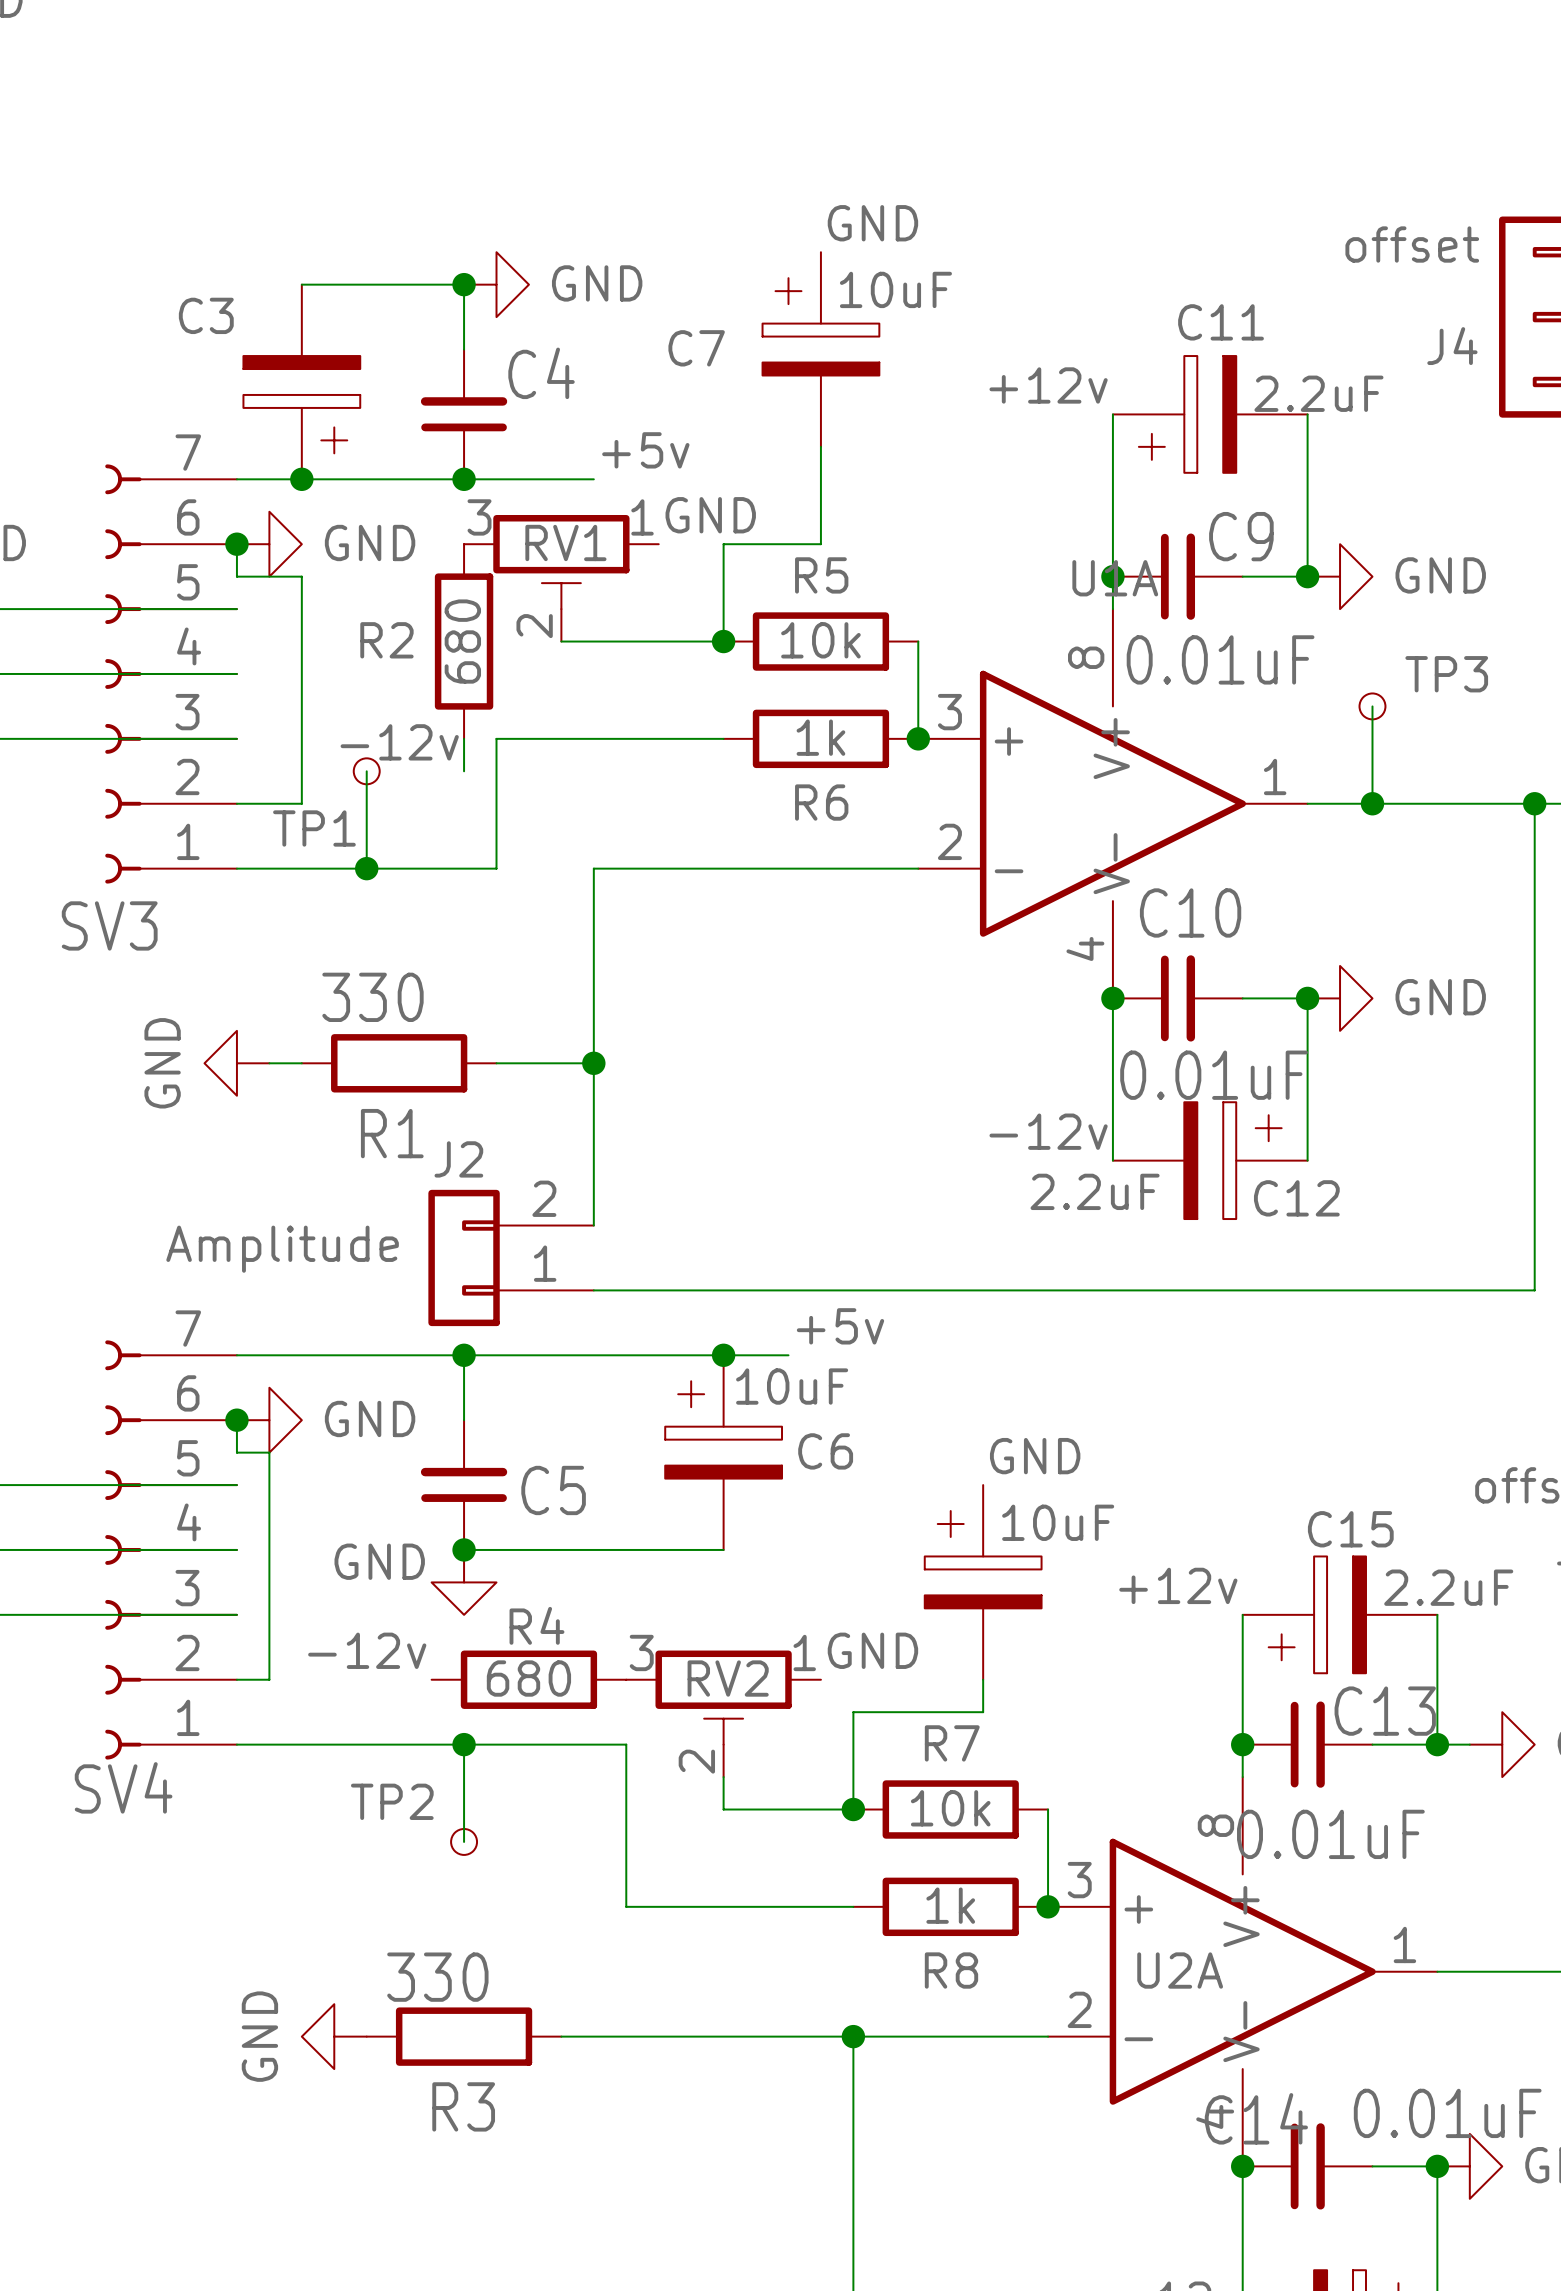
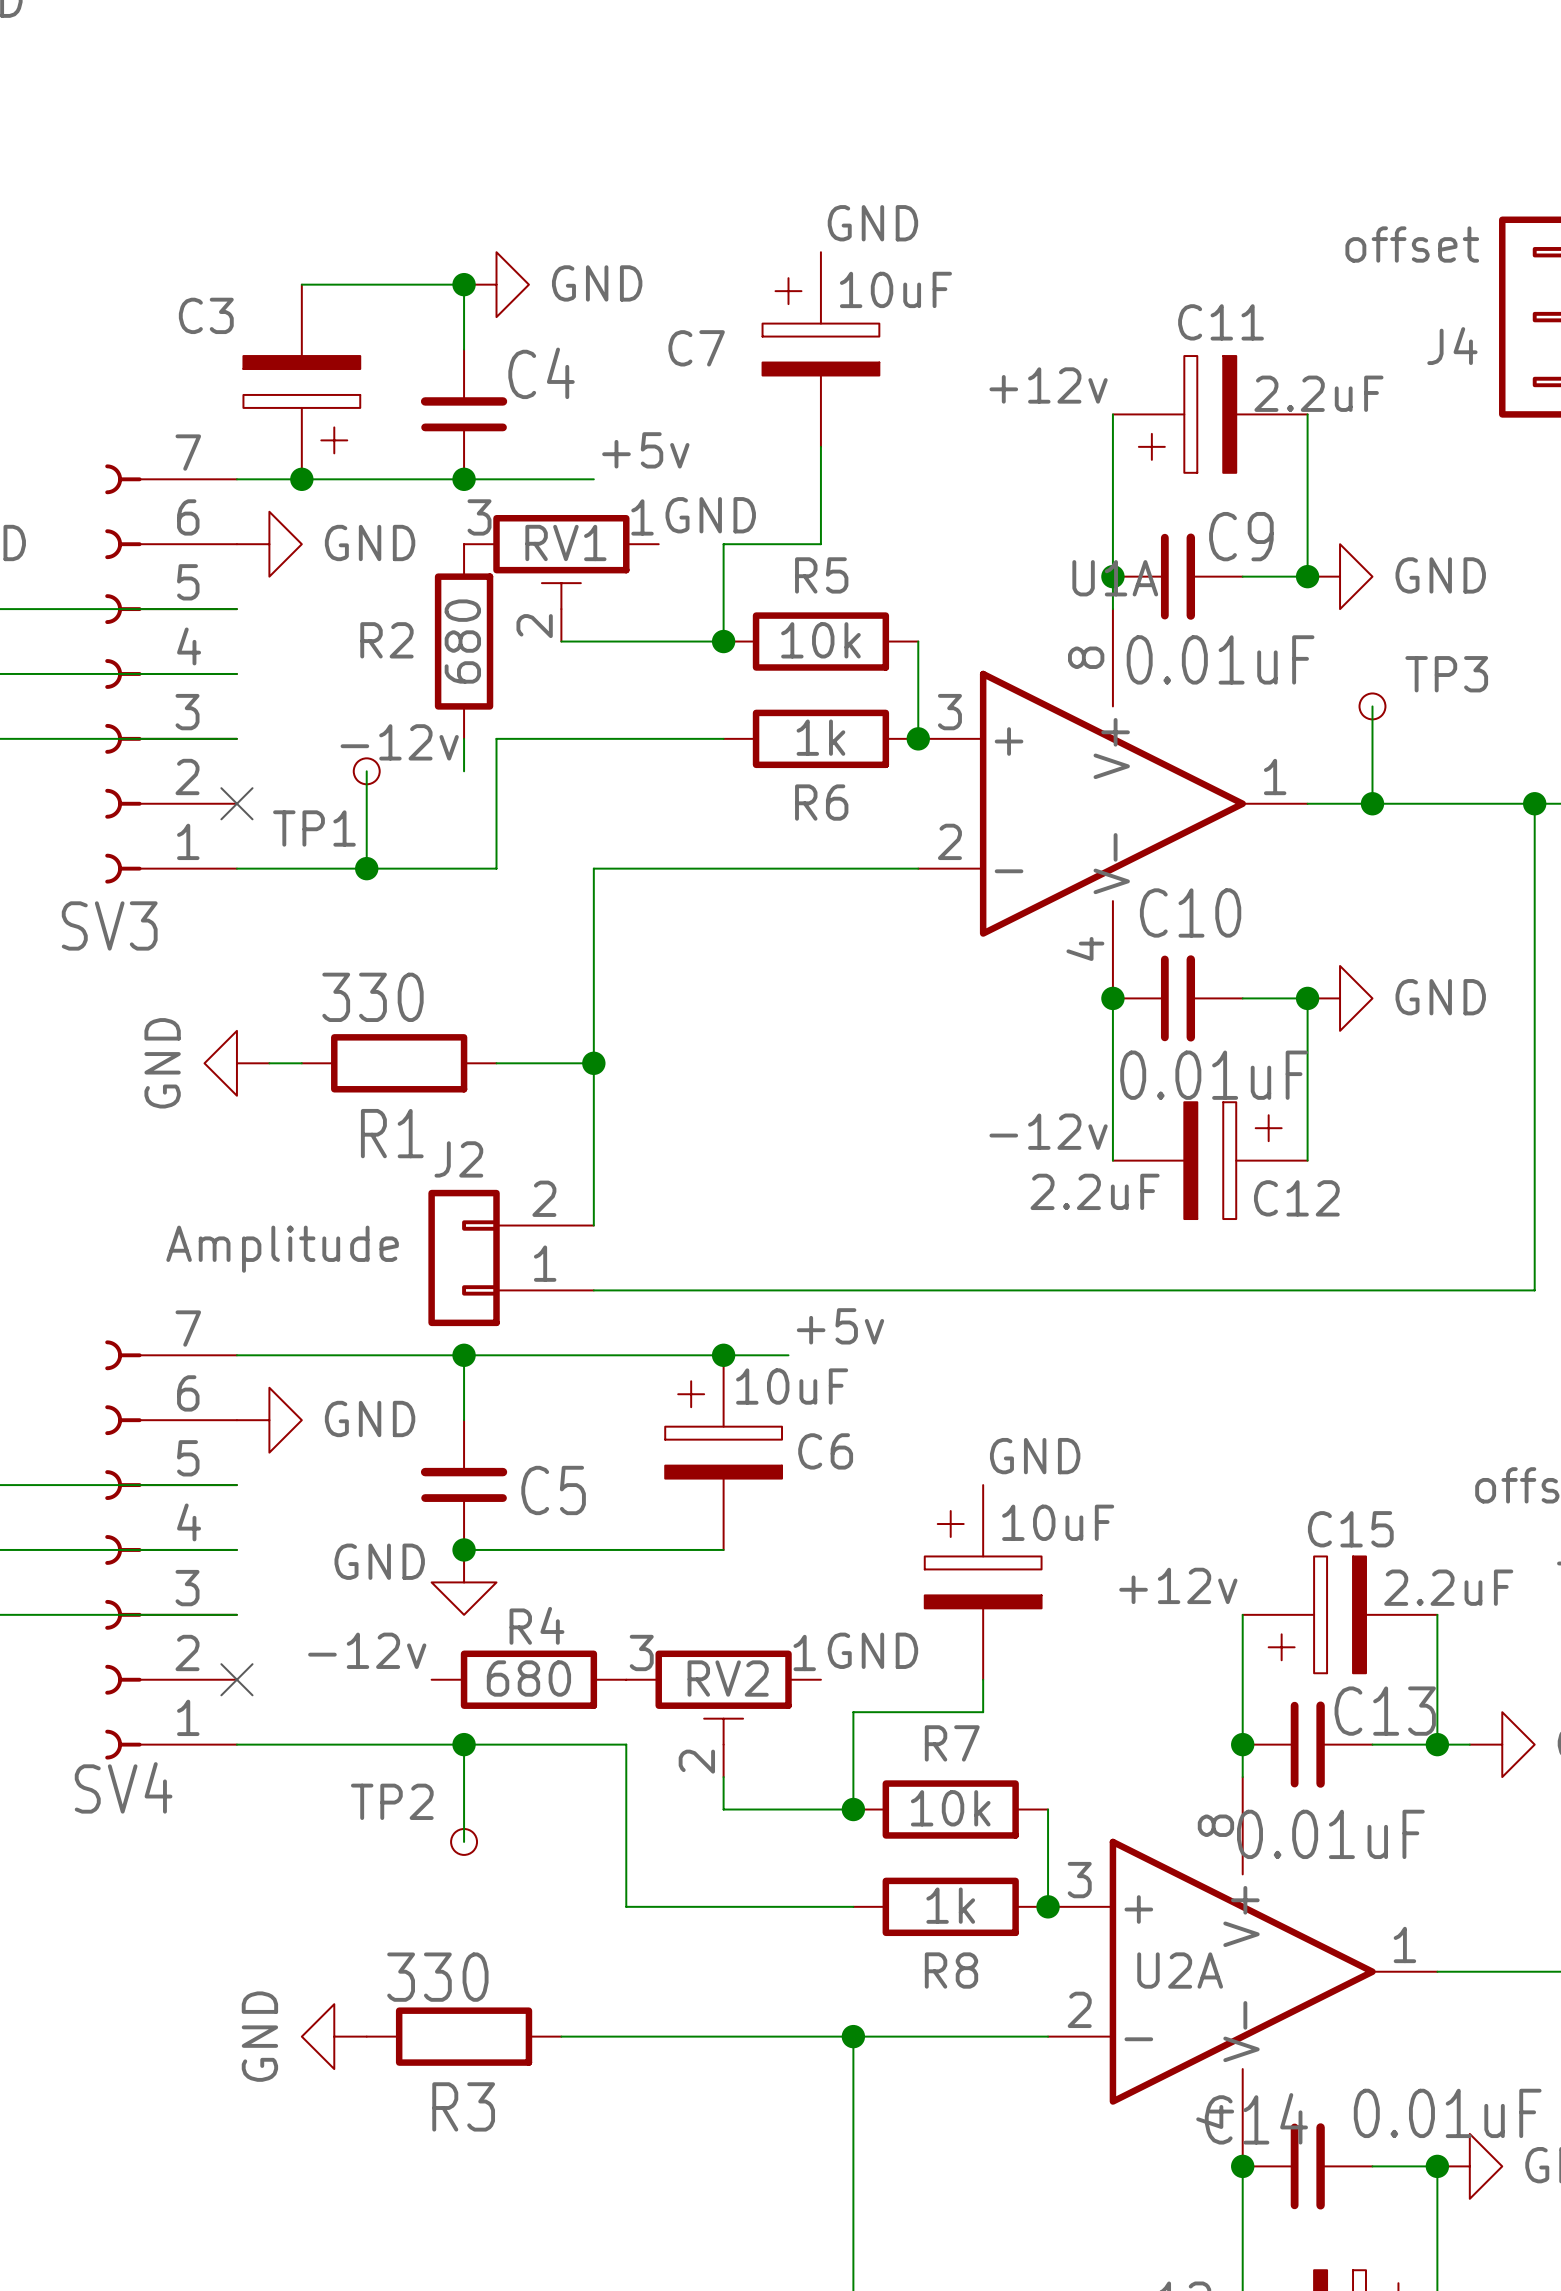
wire: (236, 544) (236, 576) (301, 576) (301, 803) (236, 803) -> none
junction: (236, 544) -> none
no-connect mark: none -> (236, 803)
wire: (236, 1420) (236, 1452) (269, 1452) (269, 1679) (236, 1679) -> none
junction: (236, 1420) -> none
no-connect mark: none -> (236, 1679)

